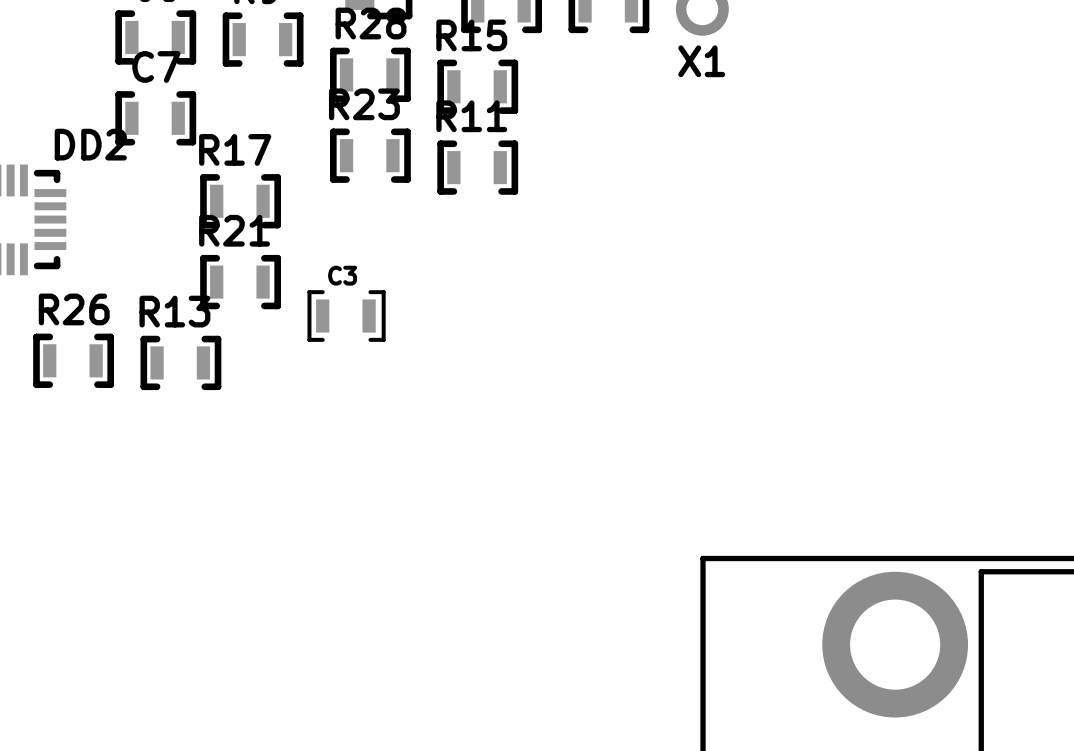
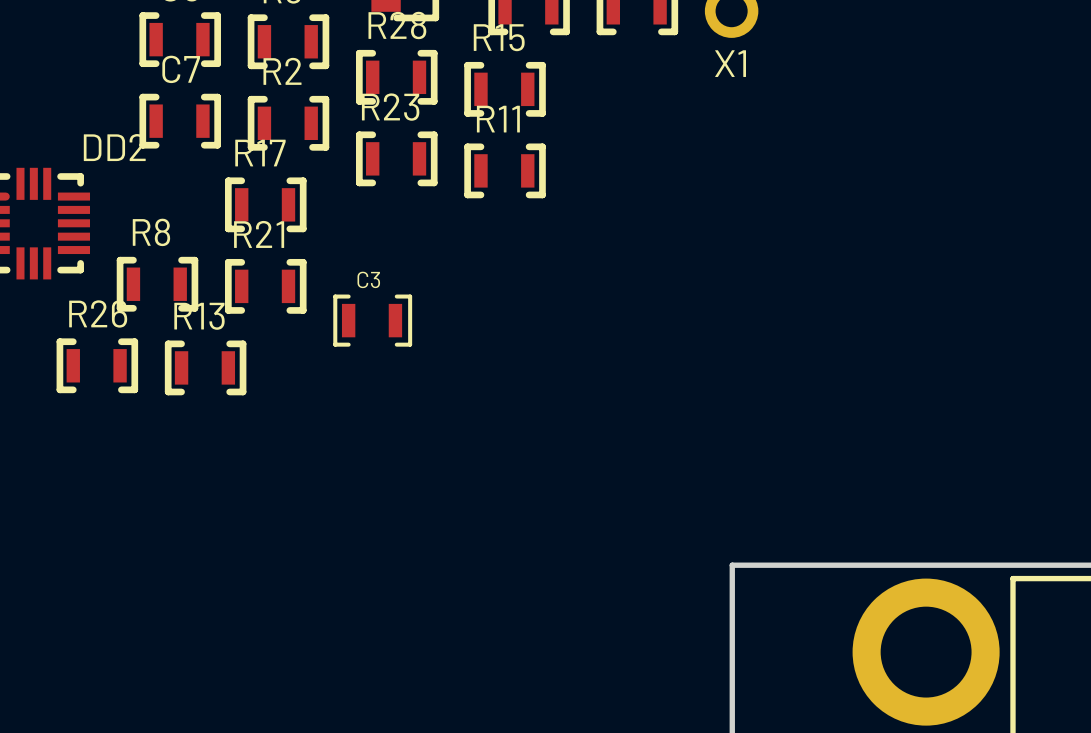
R2: none -> (288, 123)
R8: none -> (157, 284)

